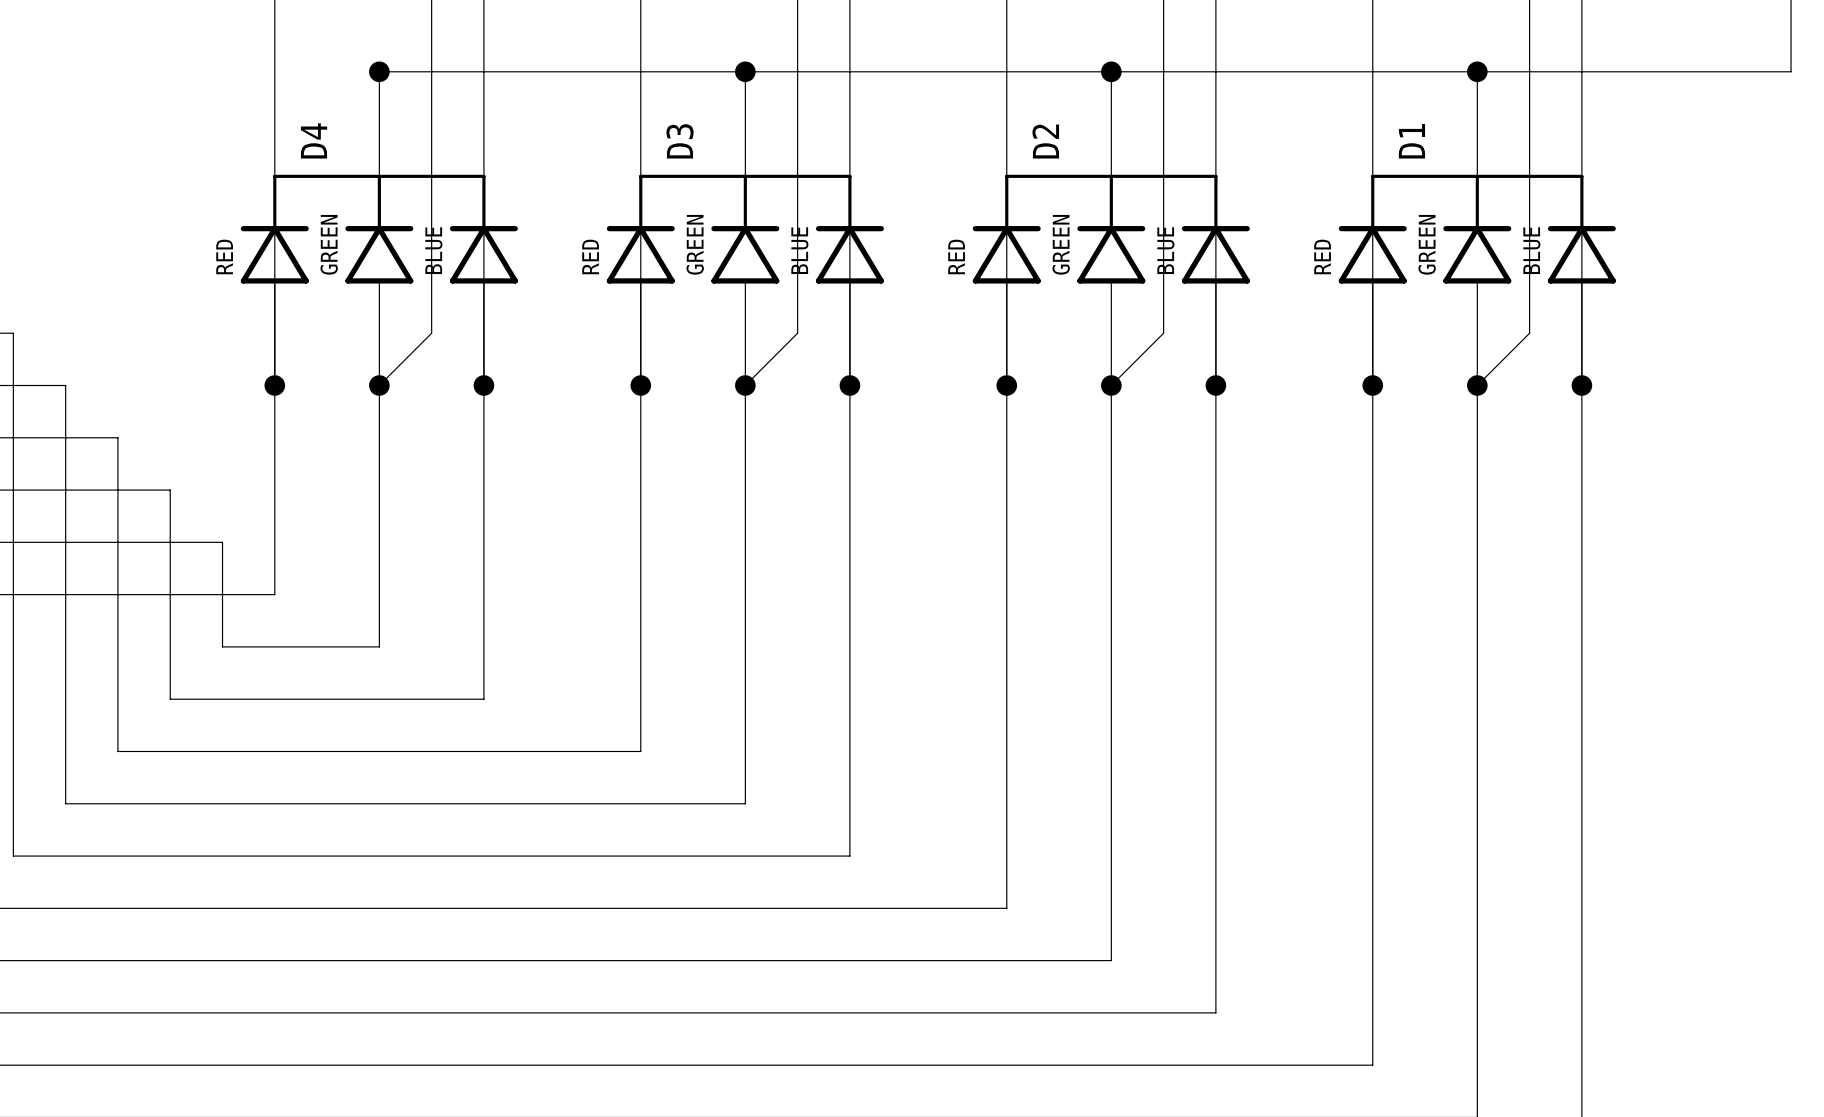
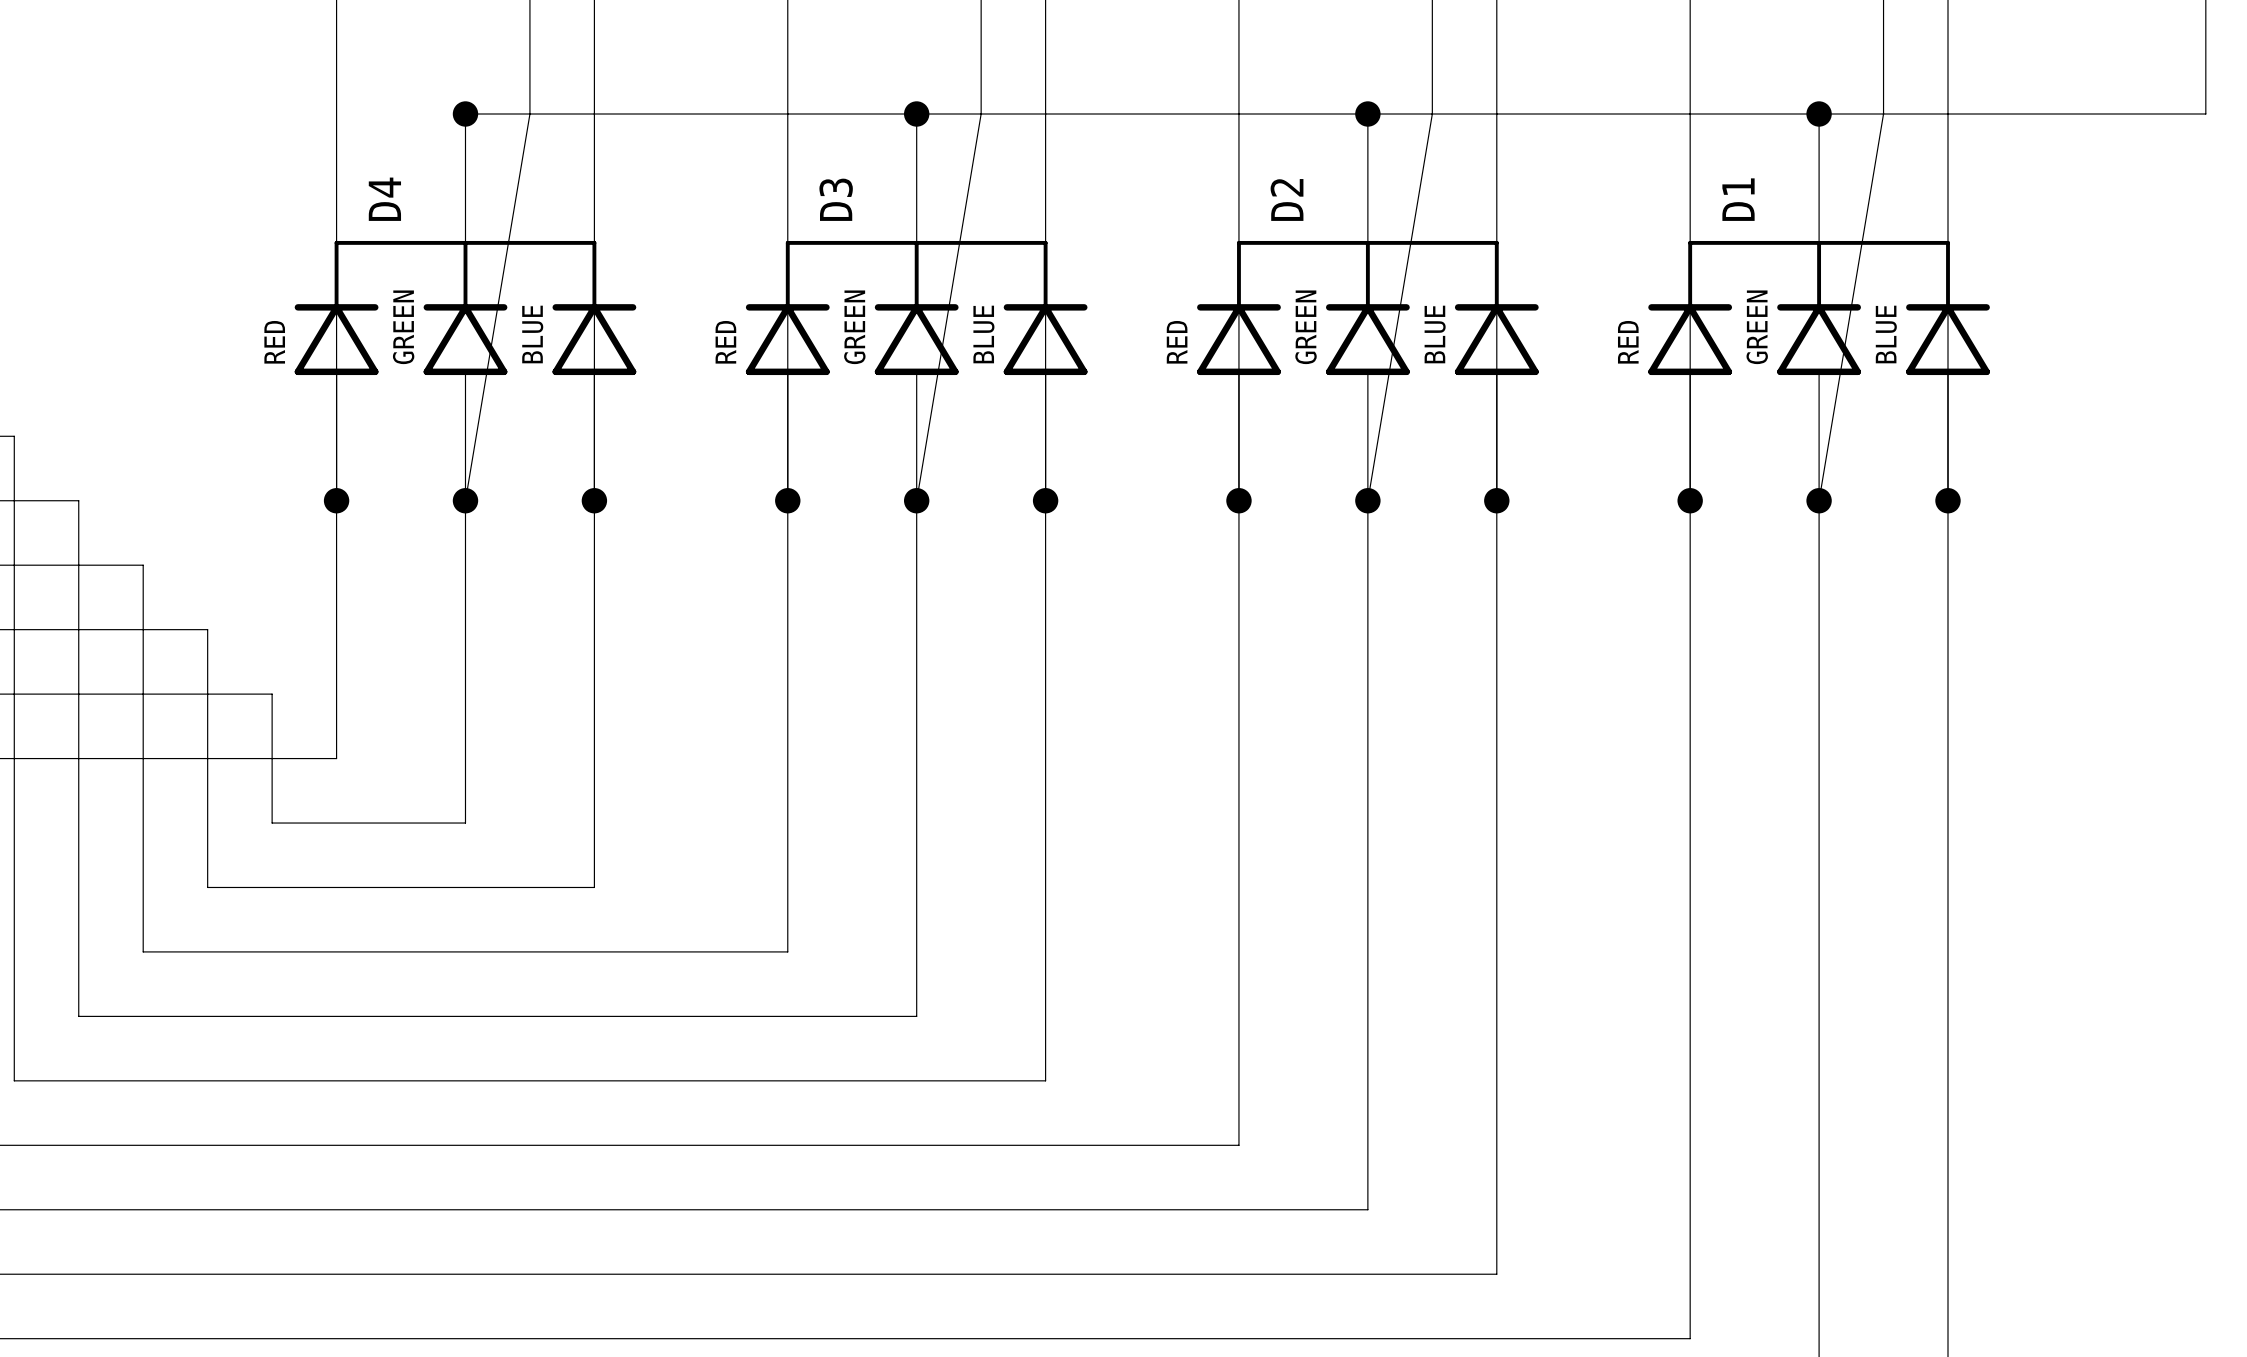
wire: (431, 71) (431, 333) (379, 385) -> (529, 113) (465, 500)
wire: (797, 71) (797, 333) (745, 385) -> (981, 113) (916, 500)
wire: (1163, 71) (1163, 333) (1111, 385) -> (1432, 113) (1367, 500)
wire: (1529, 71) (1529, 333) (1477, 385) -> (1883, 113) (1819, 500)

